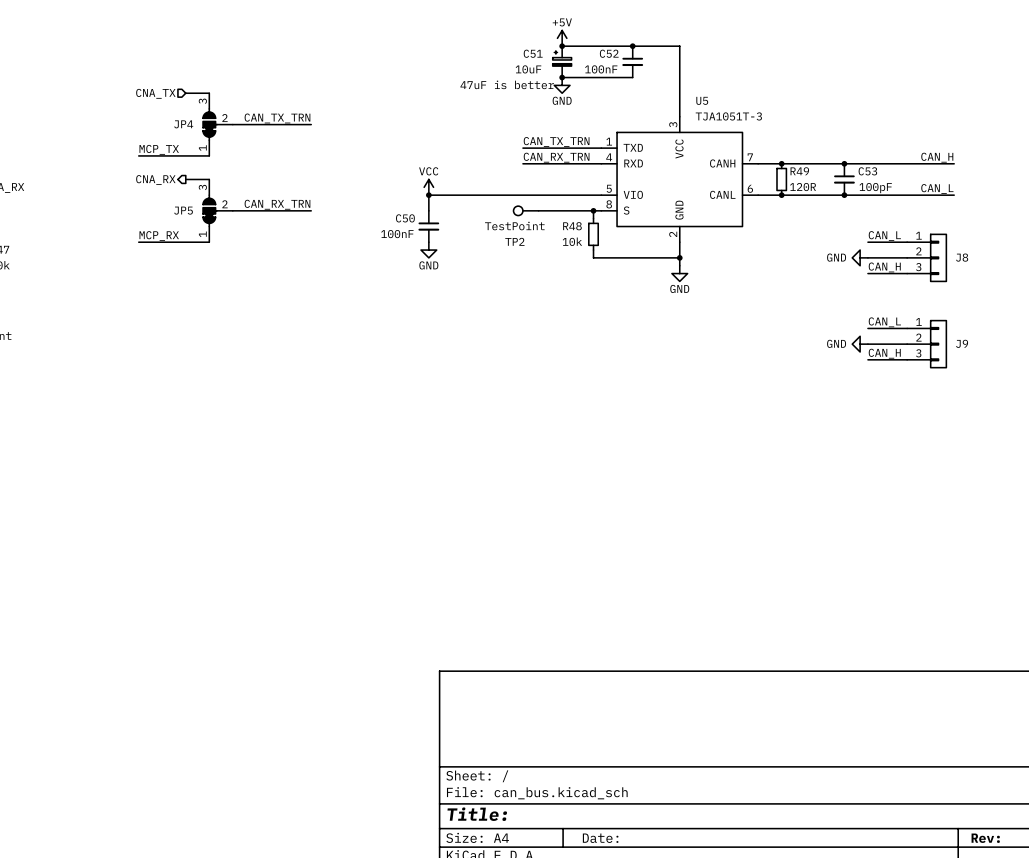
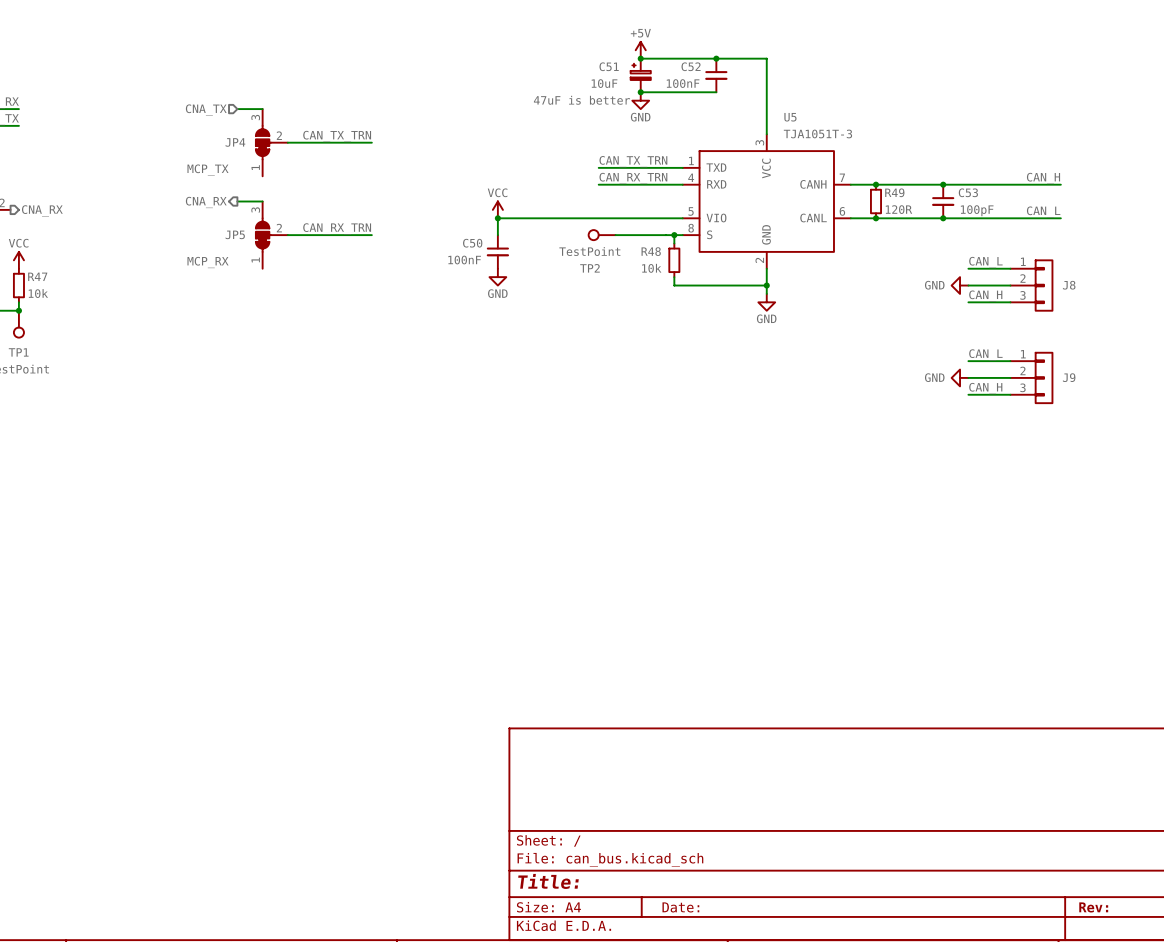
wire: (138, 155) (209, 155) -> none
wire: (138, 242) (209, 242) -> none

